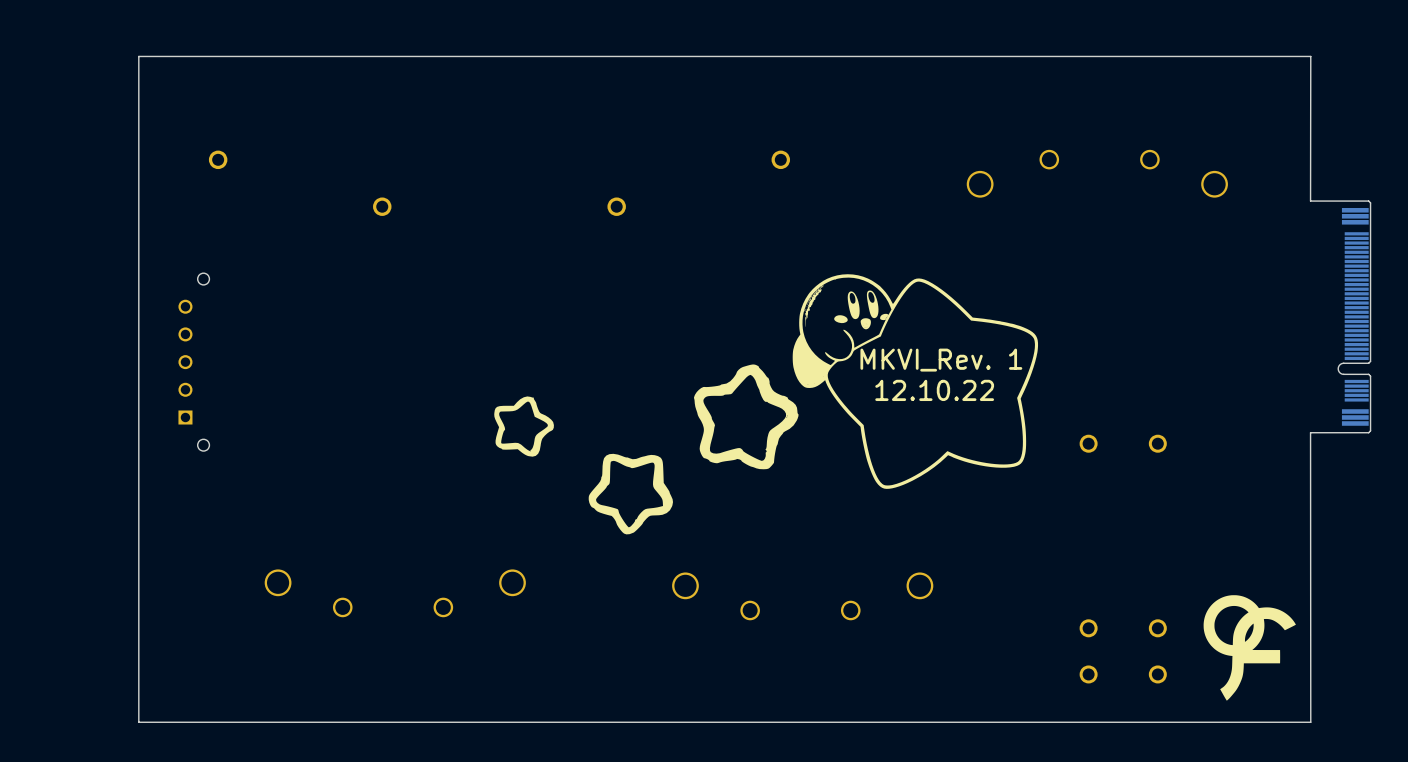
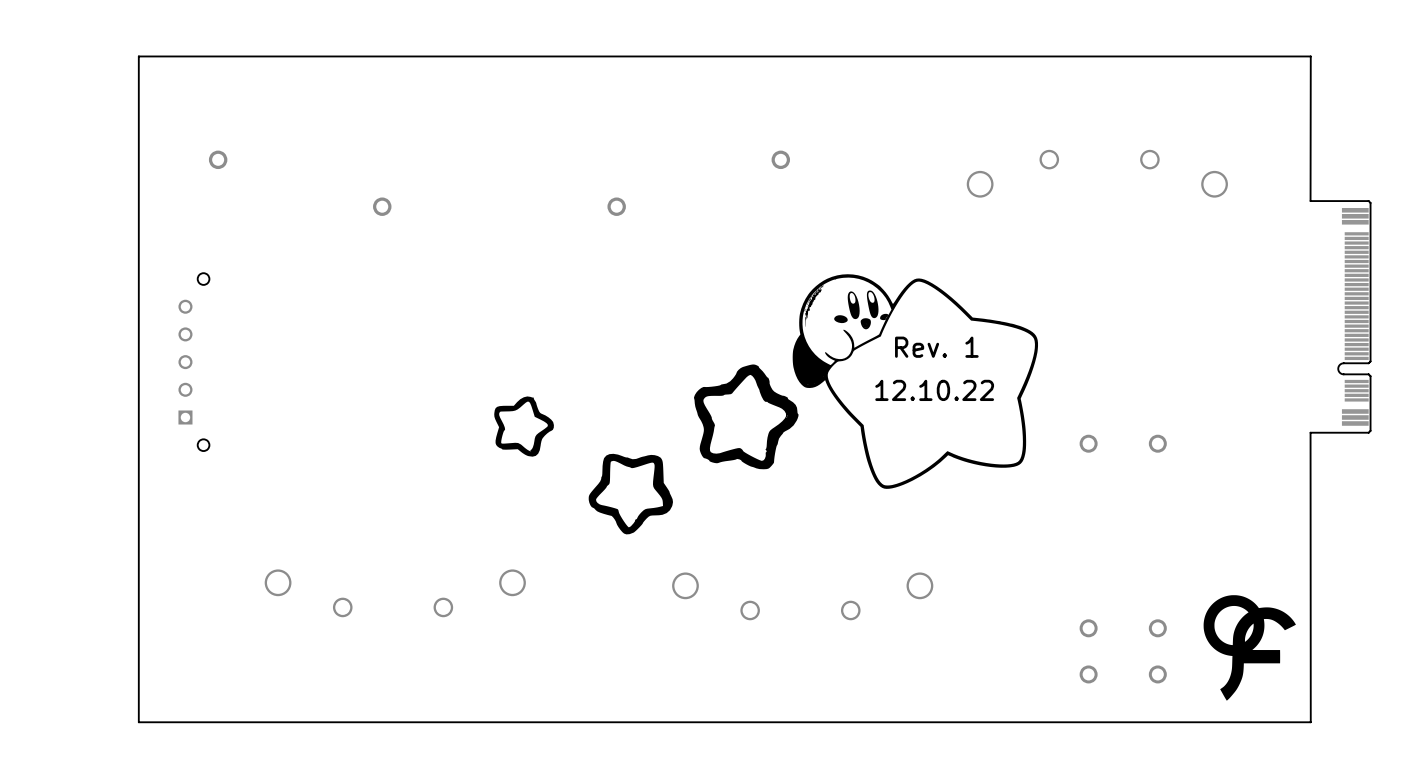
text: MKVI_Rev. 1 (941, 360) -> Rev. 1 (936, 347)

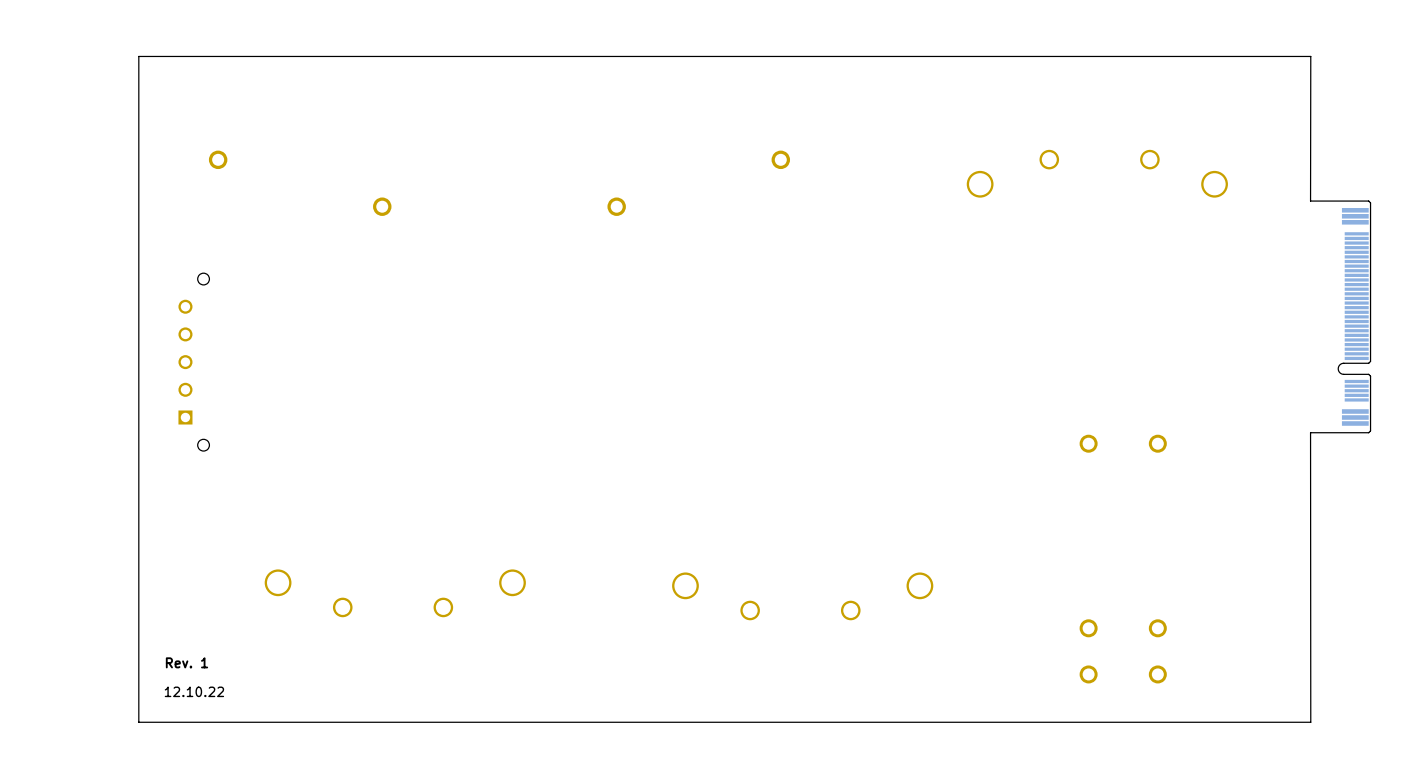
drawing: [494, 274, 1039, 535] -> none
text: Rev. 1 (936, 347) -> none
text: 12.10.22 (934, 390) -> none
drawing: [1203, 595, 1296, 701] -> none
text: none -> Rev. 1 (186, 662)
text: none -> 12.10.22 (194, 691)

